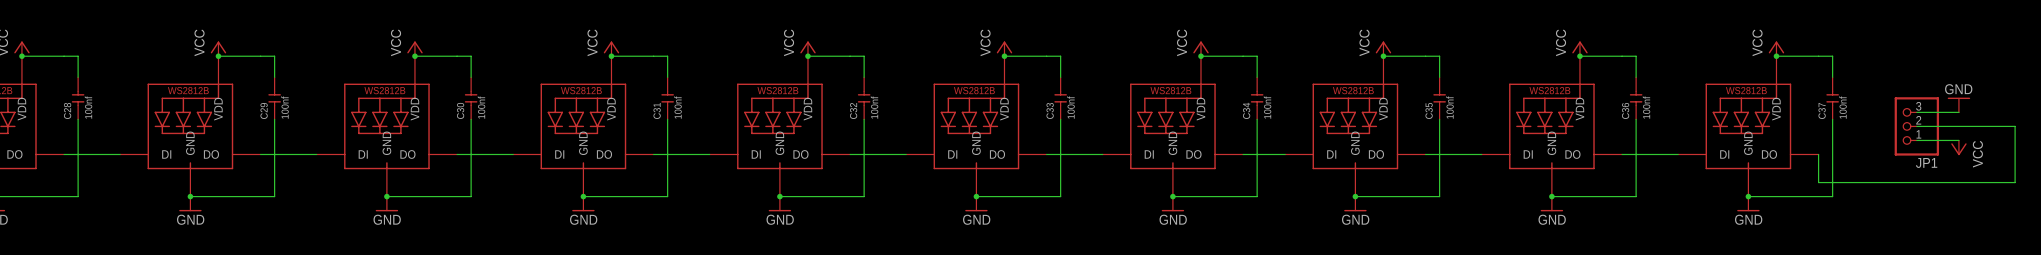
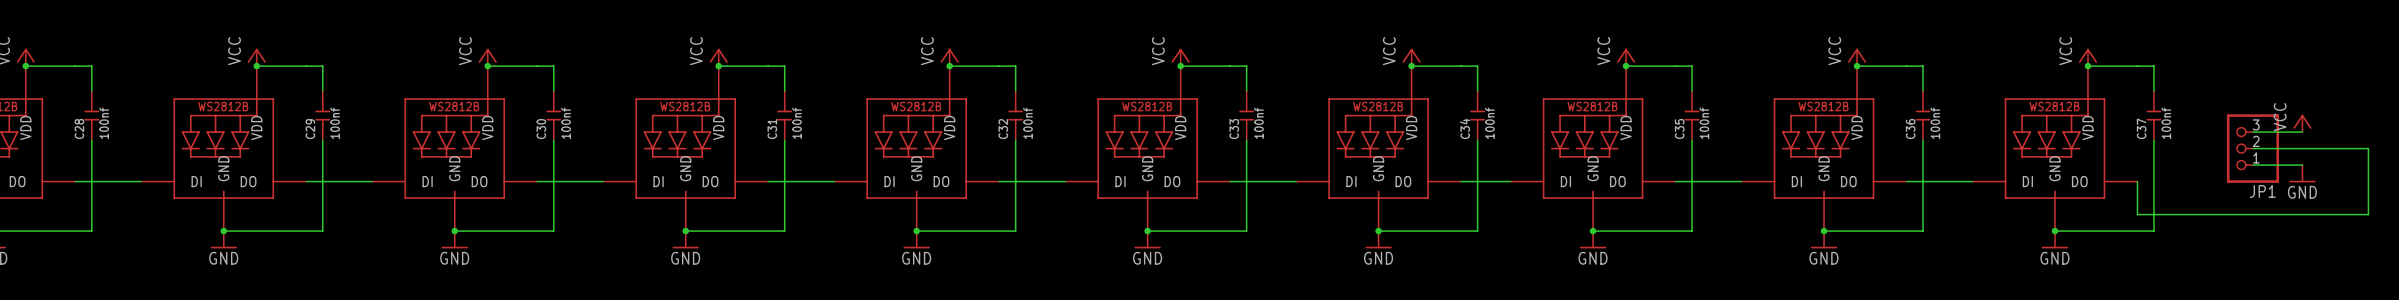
power symbol: GND (1958, 105) -> VCC (2302, 123)
power symbol: VCC (1958, 147) -> GND (2302, 173)

